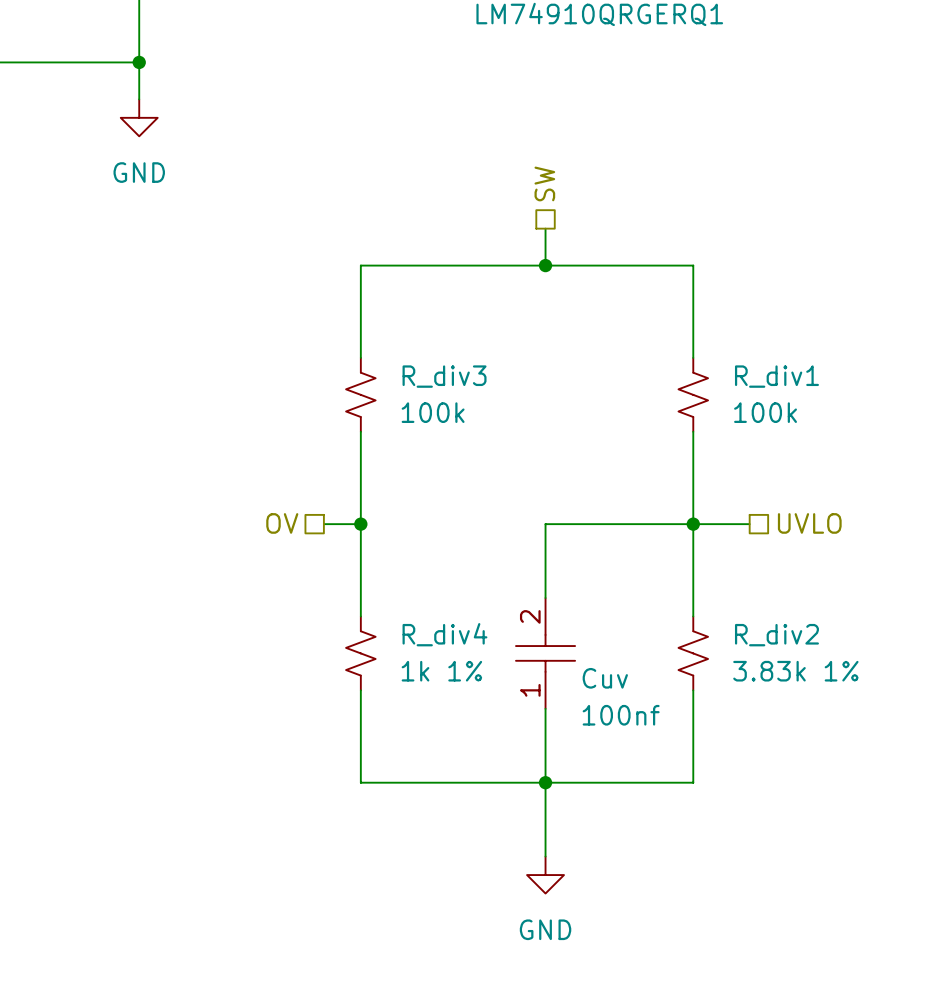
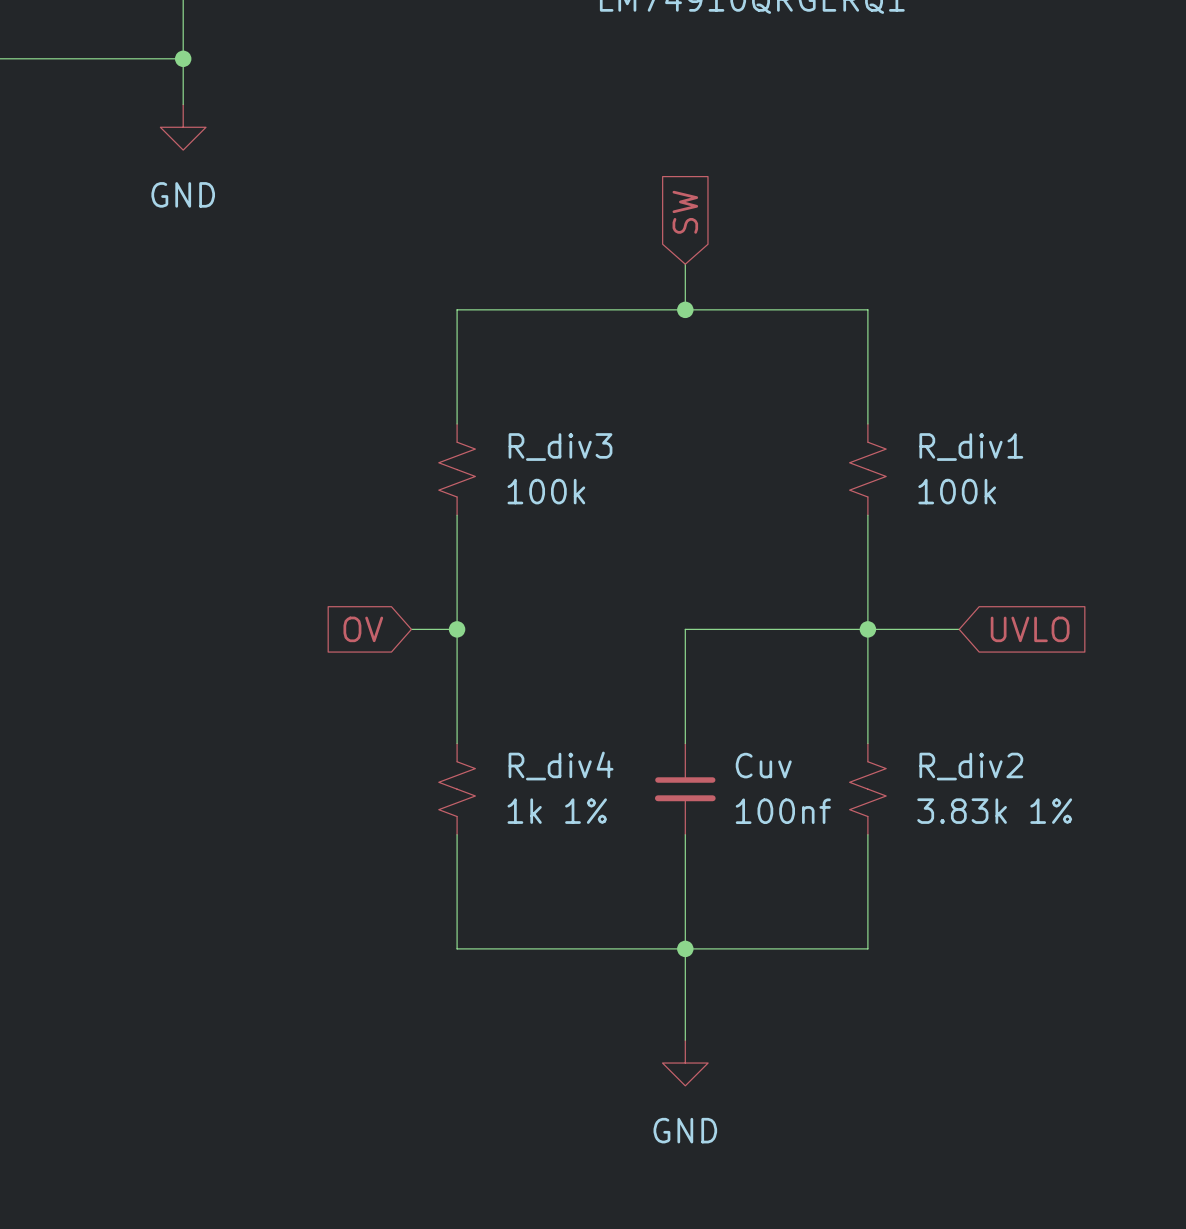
hierarchical label: SW (544, 183) -> none
global label: none -> SW (685, 212)
hierarchical label: OV (282, 523) -> none
hierarchical label: UVLO (809, 523) -> none
global label: none -> OV (363, 629)
wire: none -> (937, 629) (959, 629)
global label: none -> UVLO (1030, 629)
Cuv symbol: [515, 598, 576, 709] -> [654, 743, 716, 835]
Cuv value: none -> 100nf (783, 811)
Cuv name position: Cuv (605, 678) -> Cuv (763, 765)
Cuv text: 100nf (621, 715) -> none

